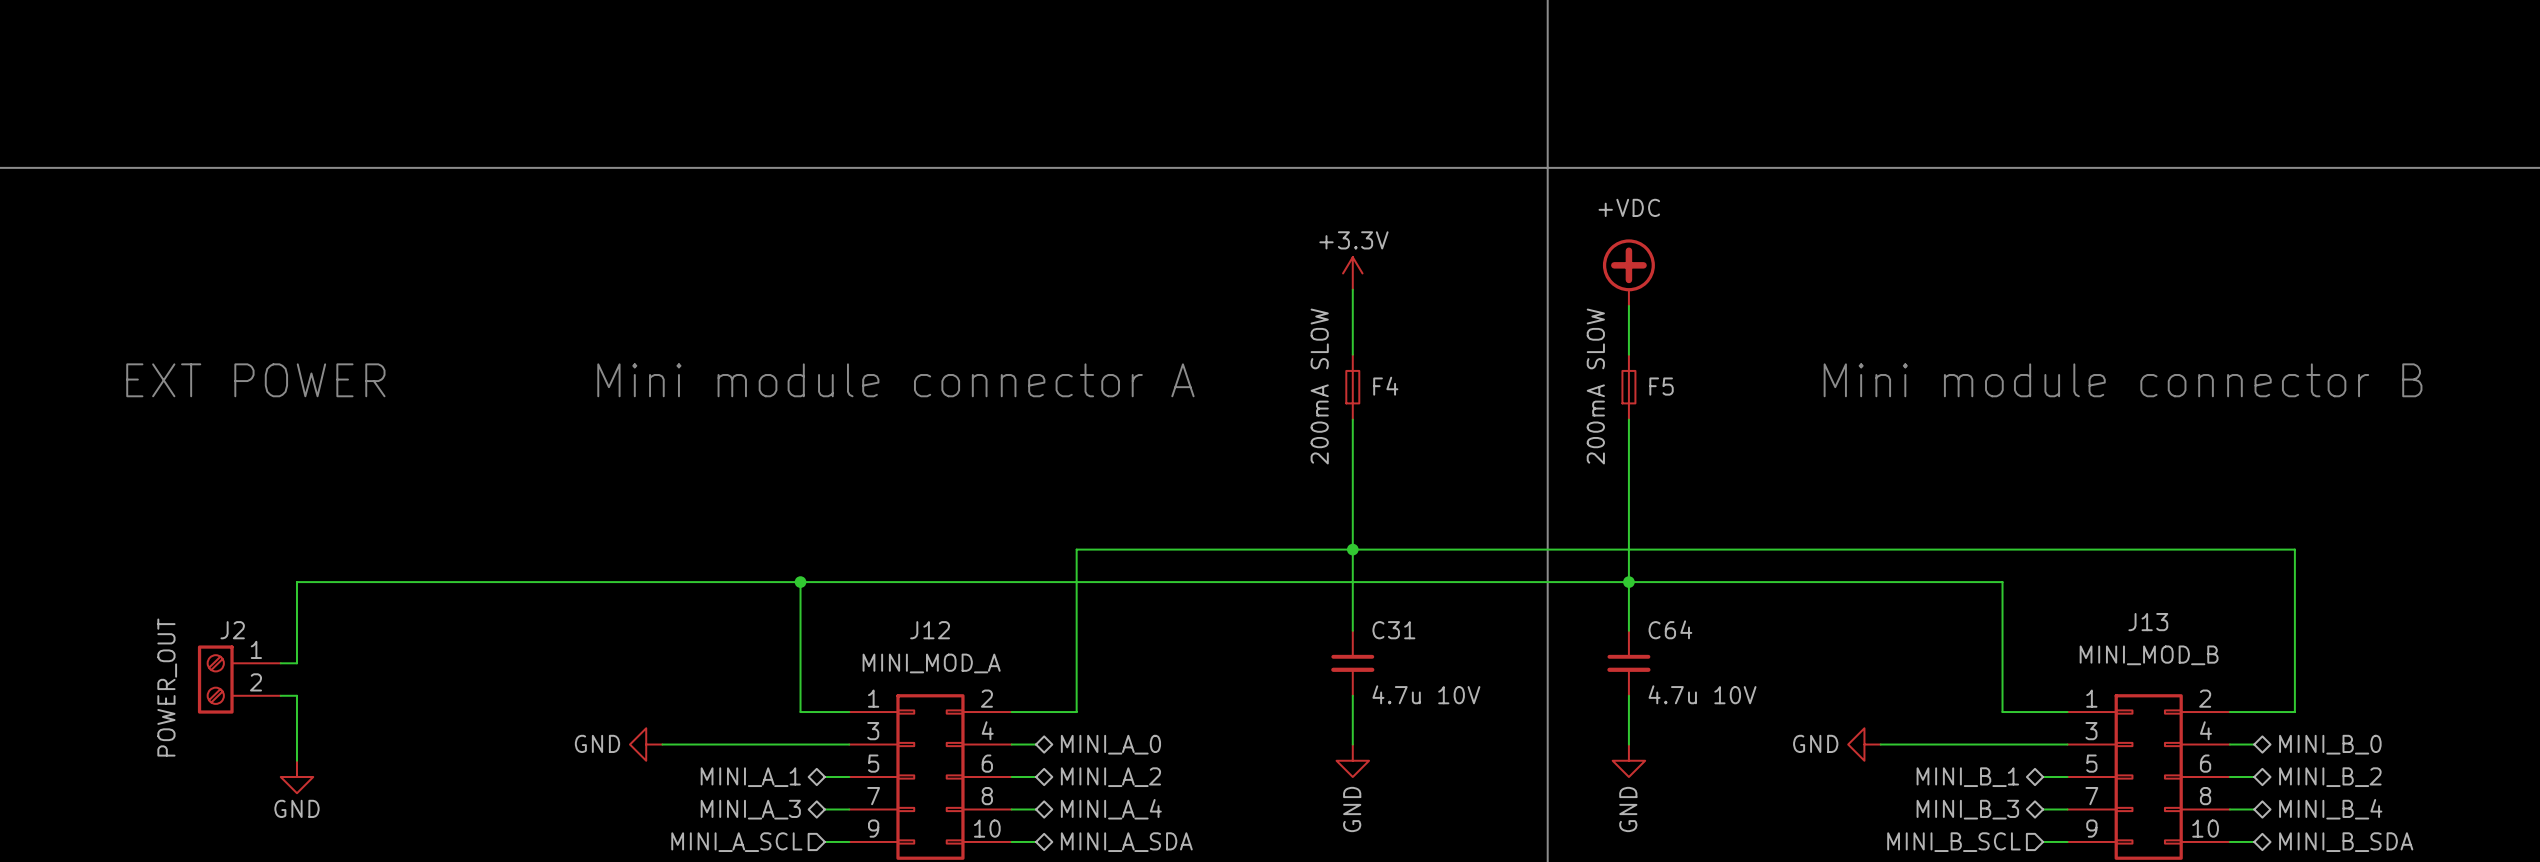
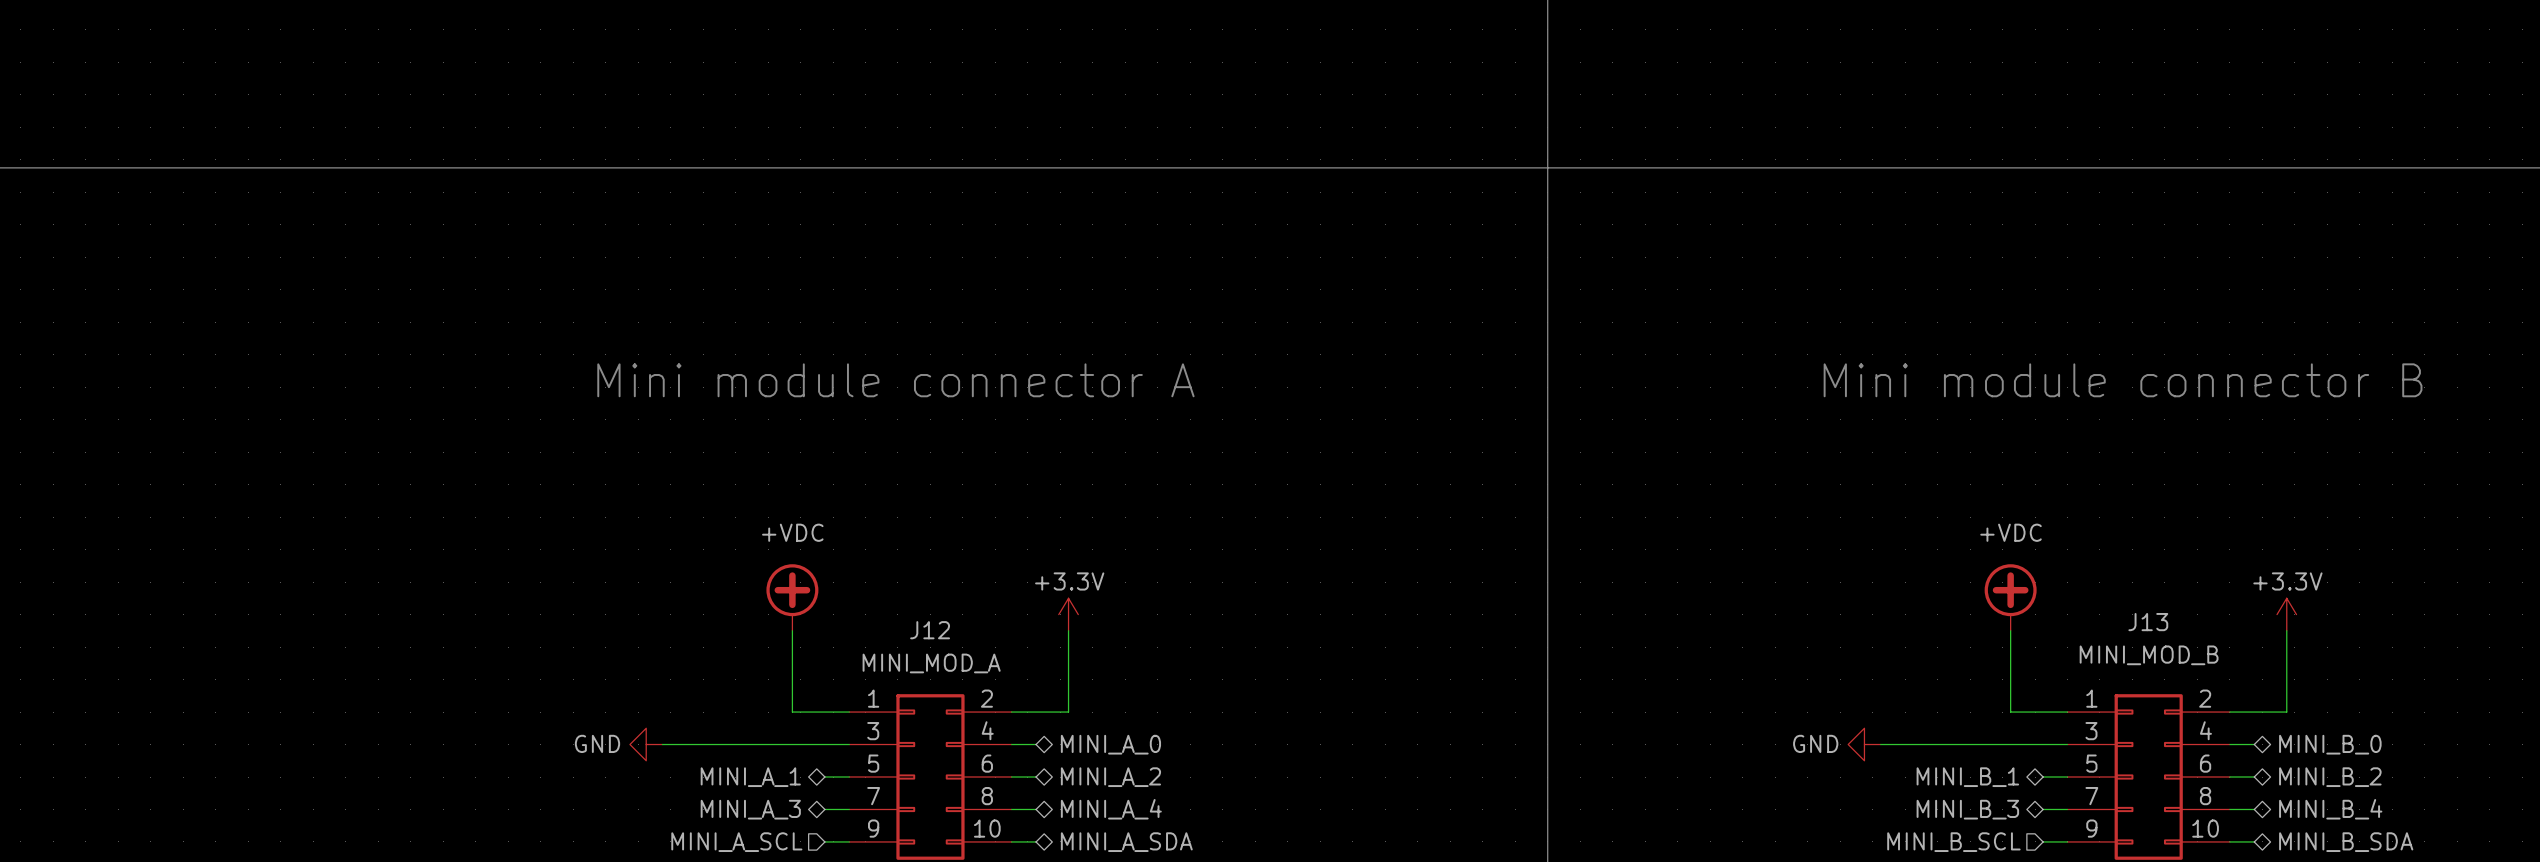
power symbol: +VDC (1628, 272) -> none
power symbol: +3.3V (1352, 273) -> none
wire: (1352, 289) (1352, 354) -> none
wire: (1628, 305) (1628, 354) -> none
text: EXT POWER (255, 380) -> none
F4: 200mA SLOW (1352, 387) -> none
F5: 200mA SLOW (1628, 387) -> none
wire: (1352, 419) (1352, 630) -> none
wire: (1628, 419) (1628, 630) -> none
junction: (1352, 549) -> none
wire: (800, 582) (800, 712) -> (792, 630) (792, 712) (800, 712)
junction: (800, 582) -> none
junction: (1628, 582) -> none
power symbol: none -> +VDC (792, 597)
power symbol: none -> +VDC (2010, 597)
power symbol: none -> +3.3V (1068, 614)
power symbol: none -> +3.3V (2286, 614)
wire: none -> (2286, 630) (2286, 712)
wire: (280, 663) (296, 663) (296, 582) (2002, 582) (2002, 712) (2010, 712) -> (2010, 630) (2010, 712)
C31: 4.7u 10V (1352, 663) -> none
C64: 4.7u 10V (1628, 663) -> none
J2: POWER_OUT (239, 679) -> none
wire: (280, 695) (296, 695) (296, 760) -> none
wire: (1352, 695) (1352, 744) -> none
wire: (1628, 695) (1628, 744) -> none
wire: (1068, 712) (1076, 712) (1076, 549) (2294, 549) (2294, 712) (2286, 712) -> (1068, 712) (1068, 630)
power symbol: GND (1352, 760) -> none
power symbol: GND (1628, 760) -> none
power symbol: GND (296, 777) -> none

